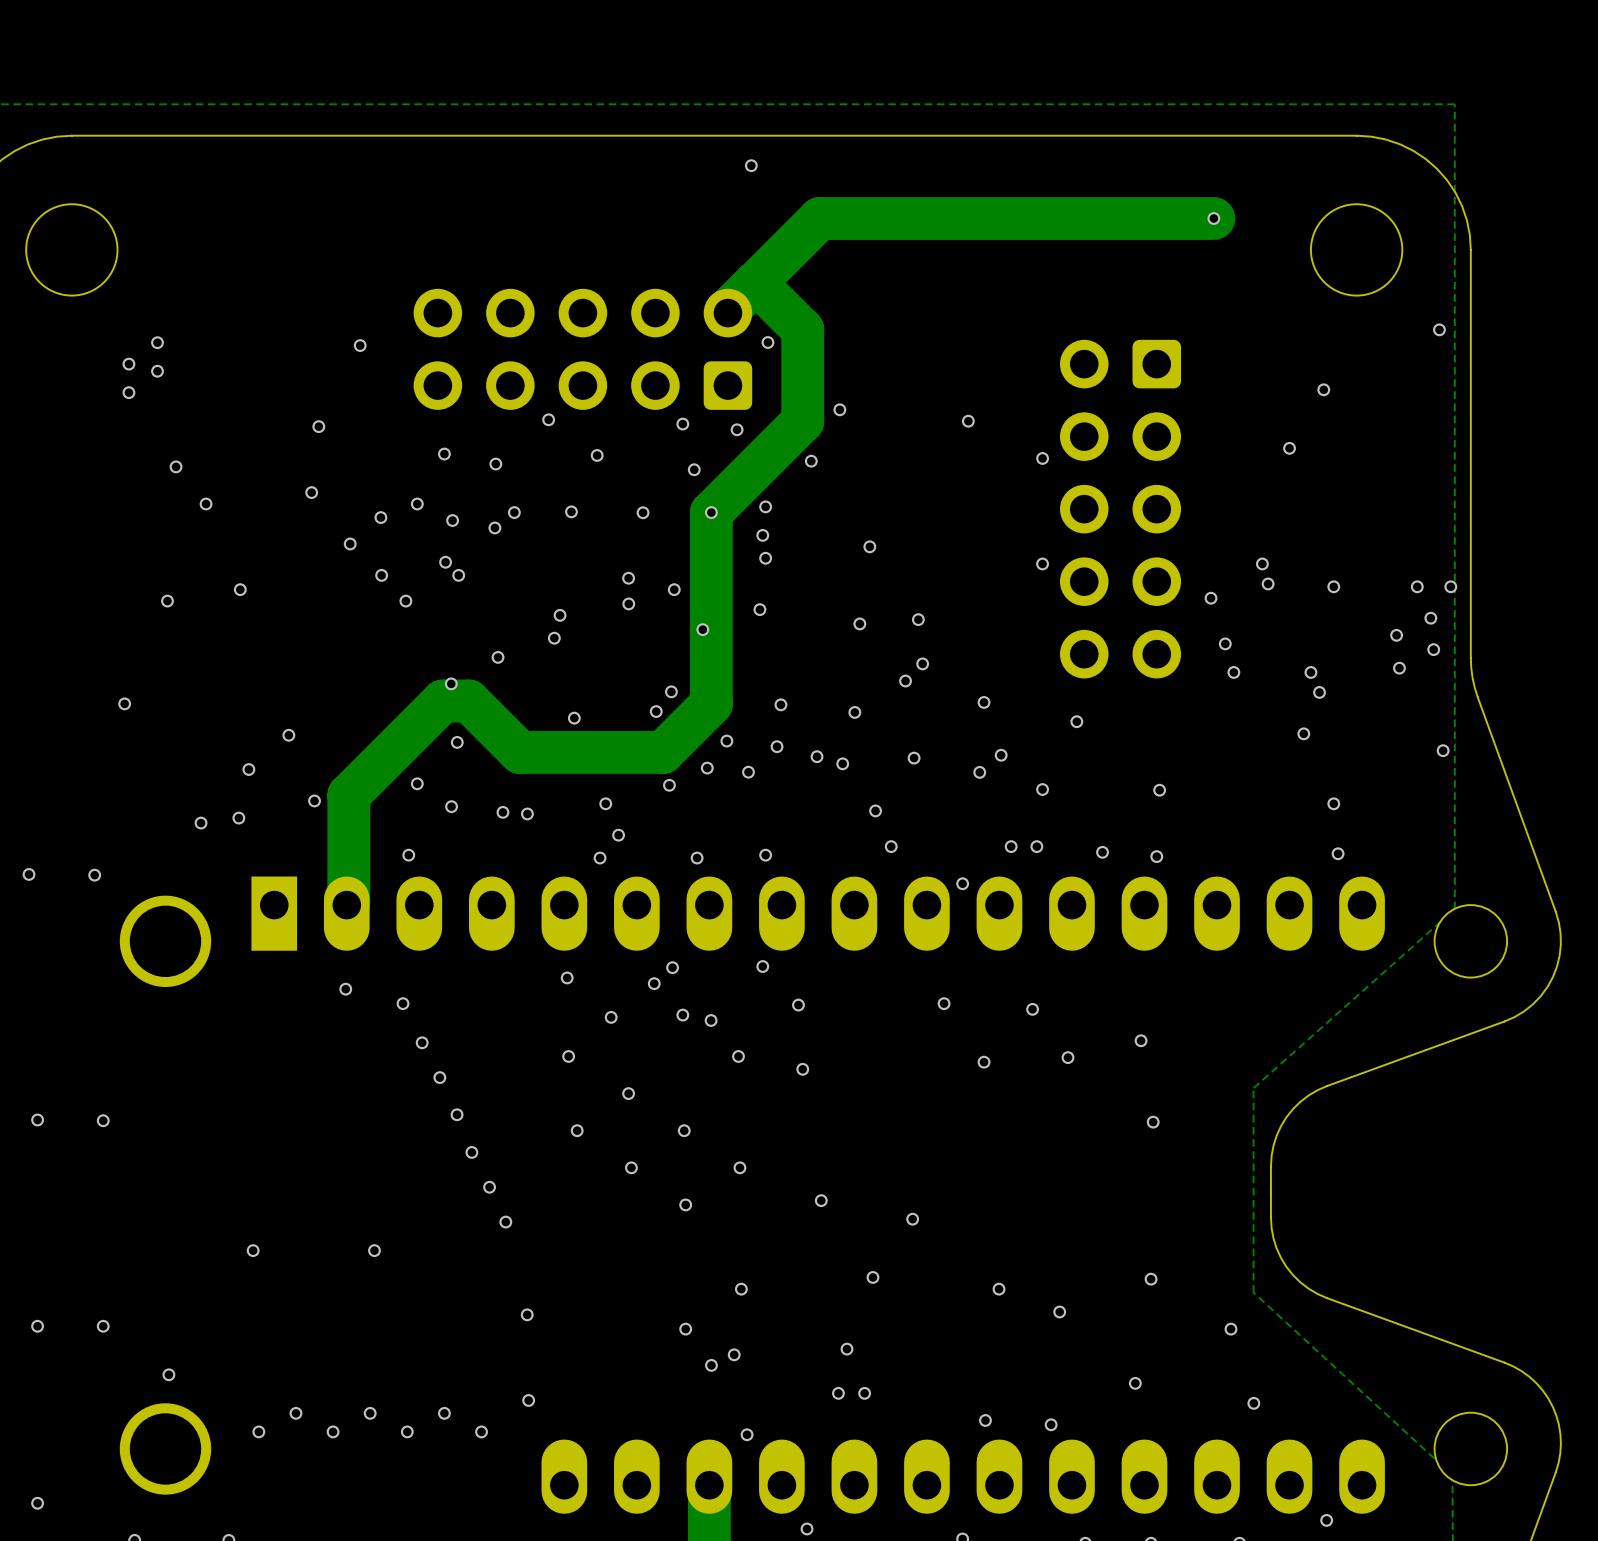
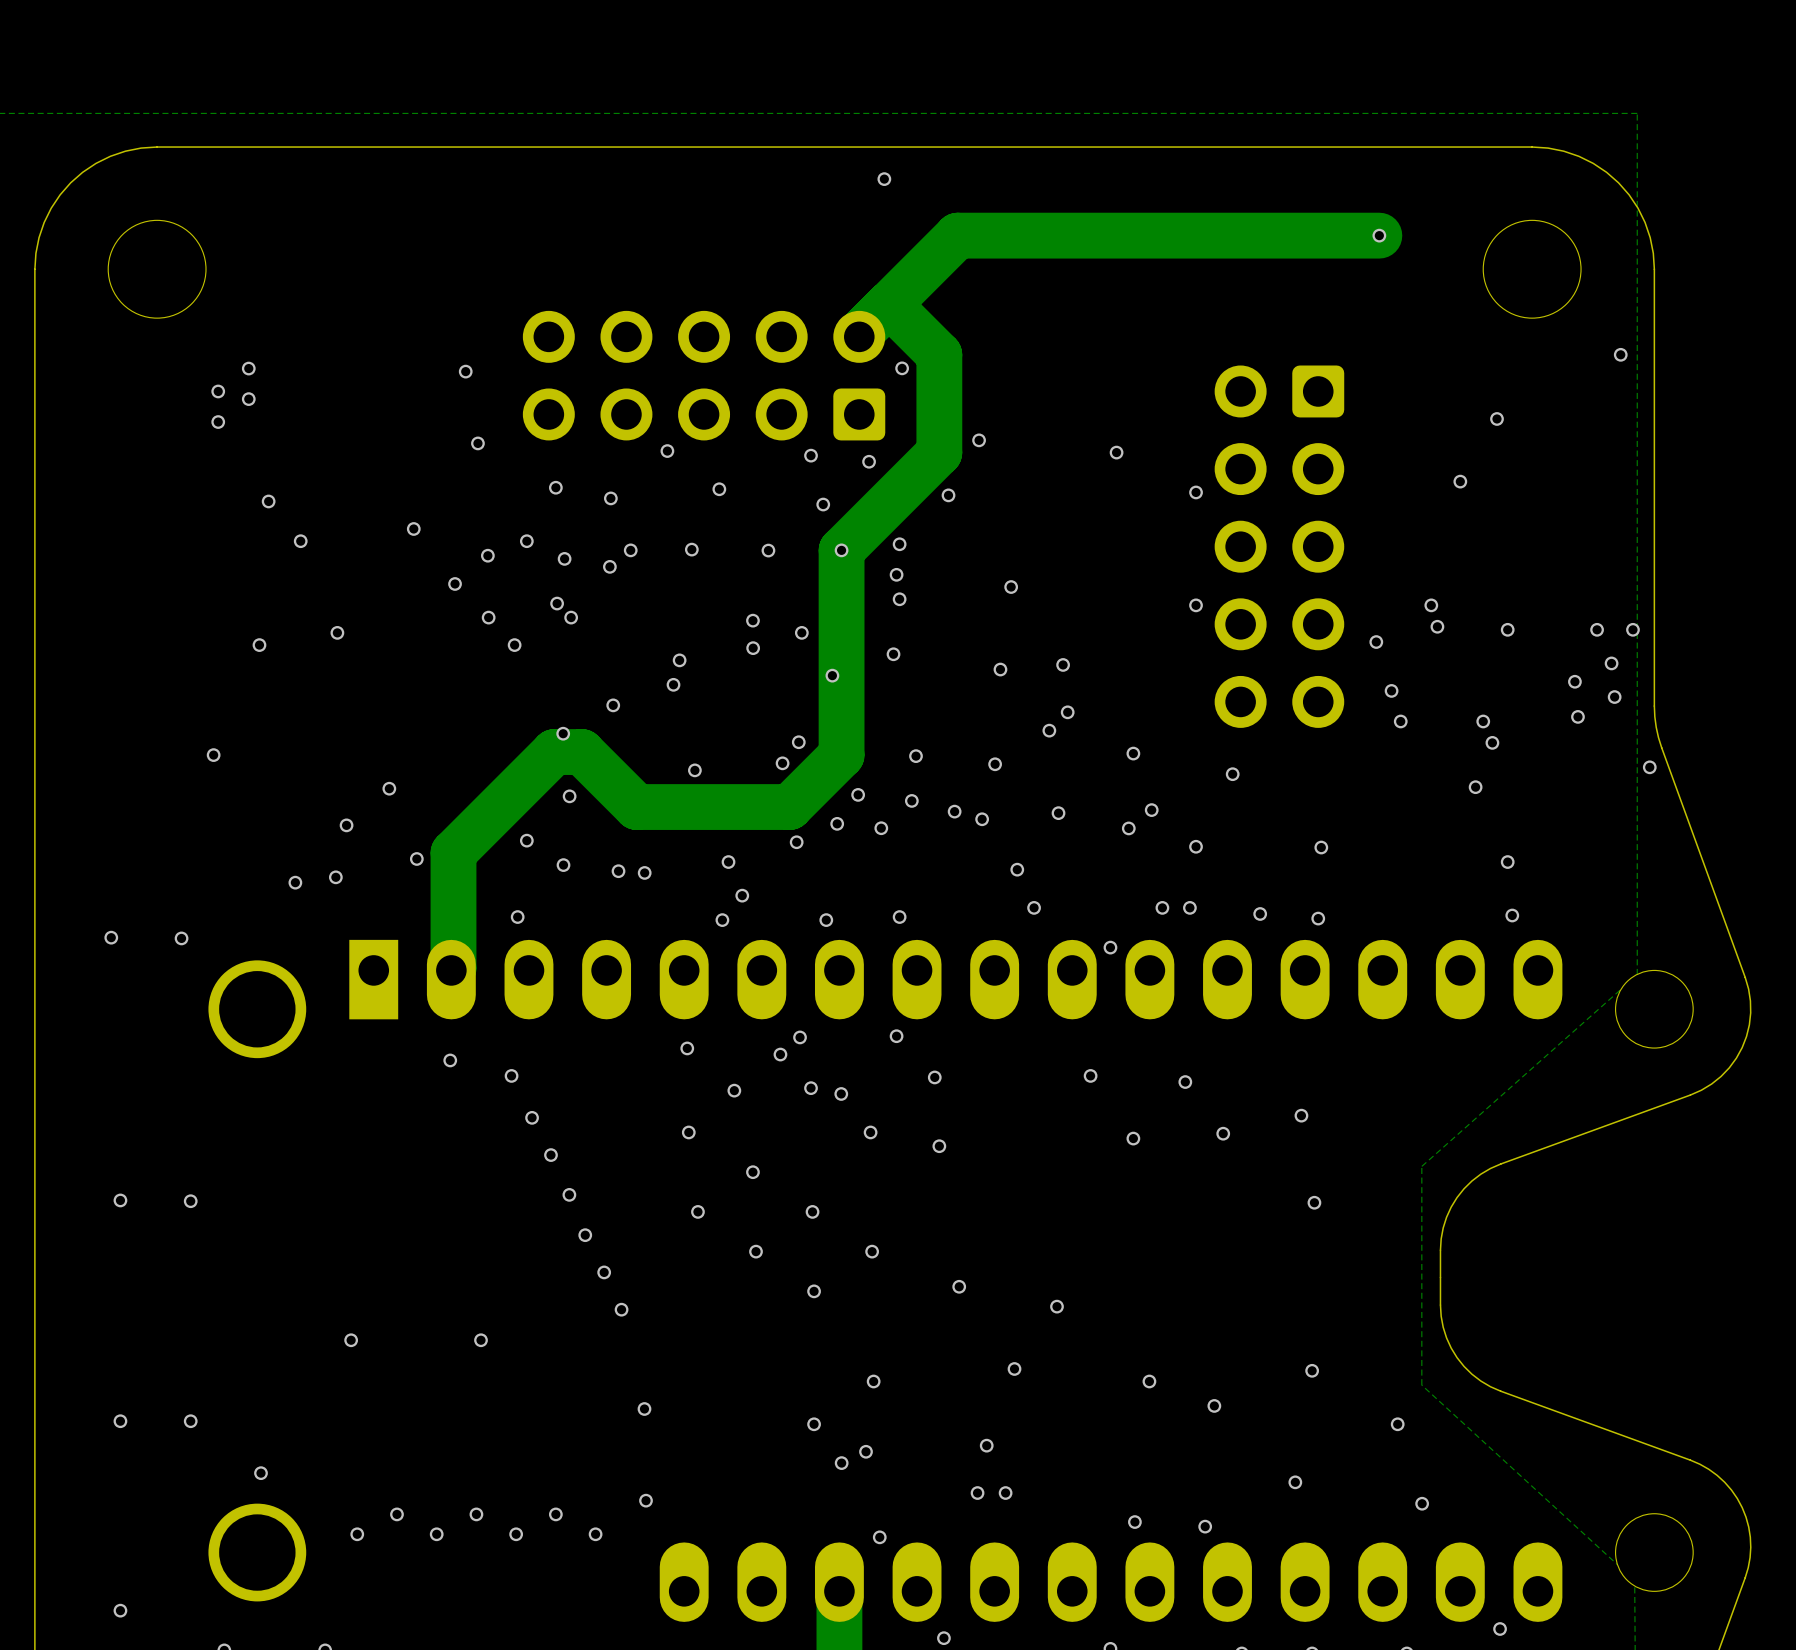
via position: (318, 426) -> (477, 443)
via position: (1443, 750) -> (1649, 767)

